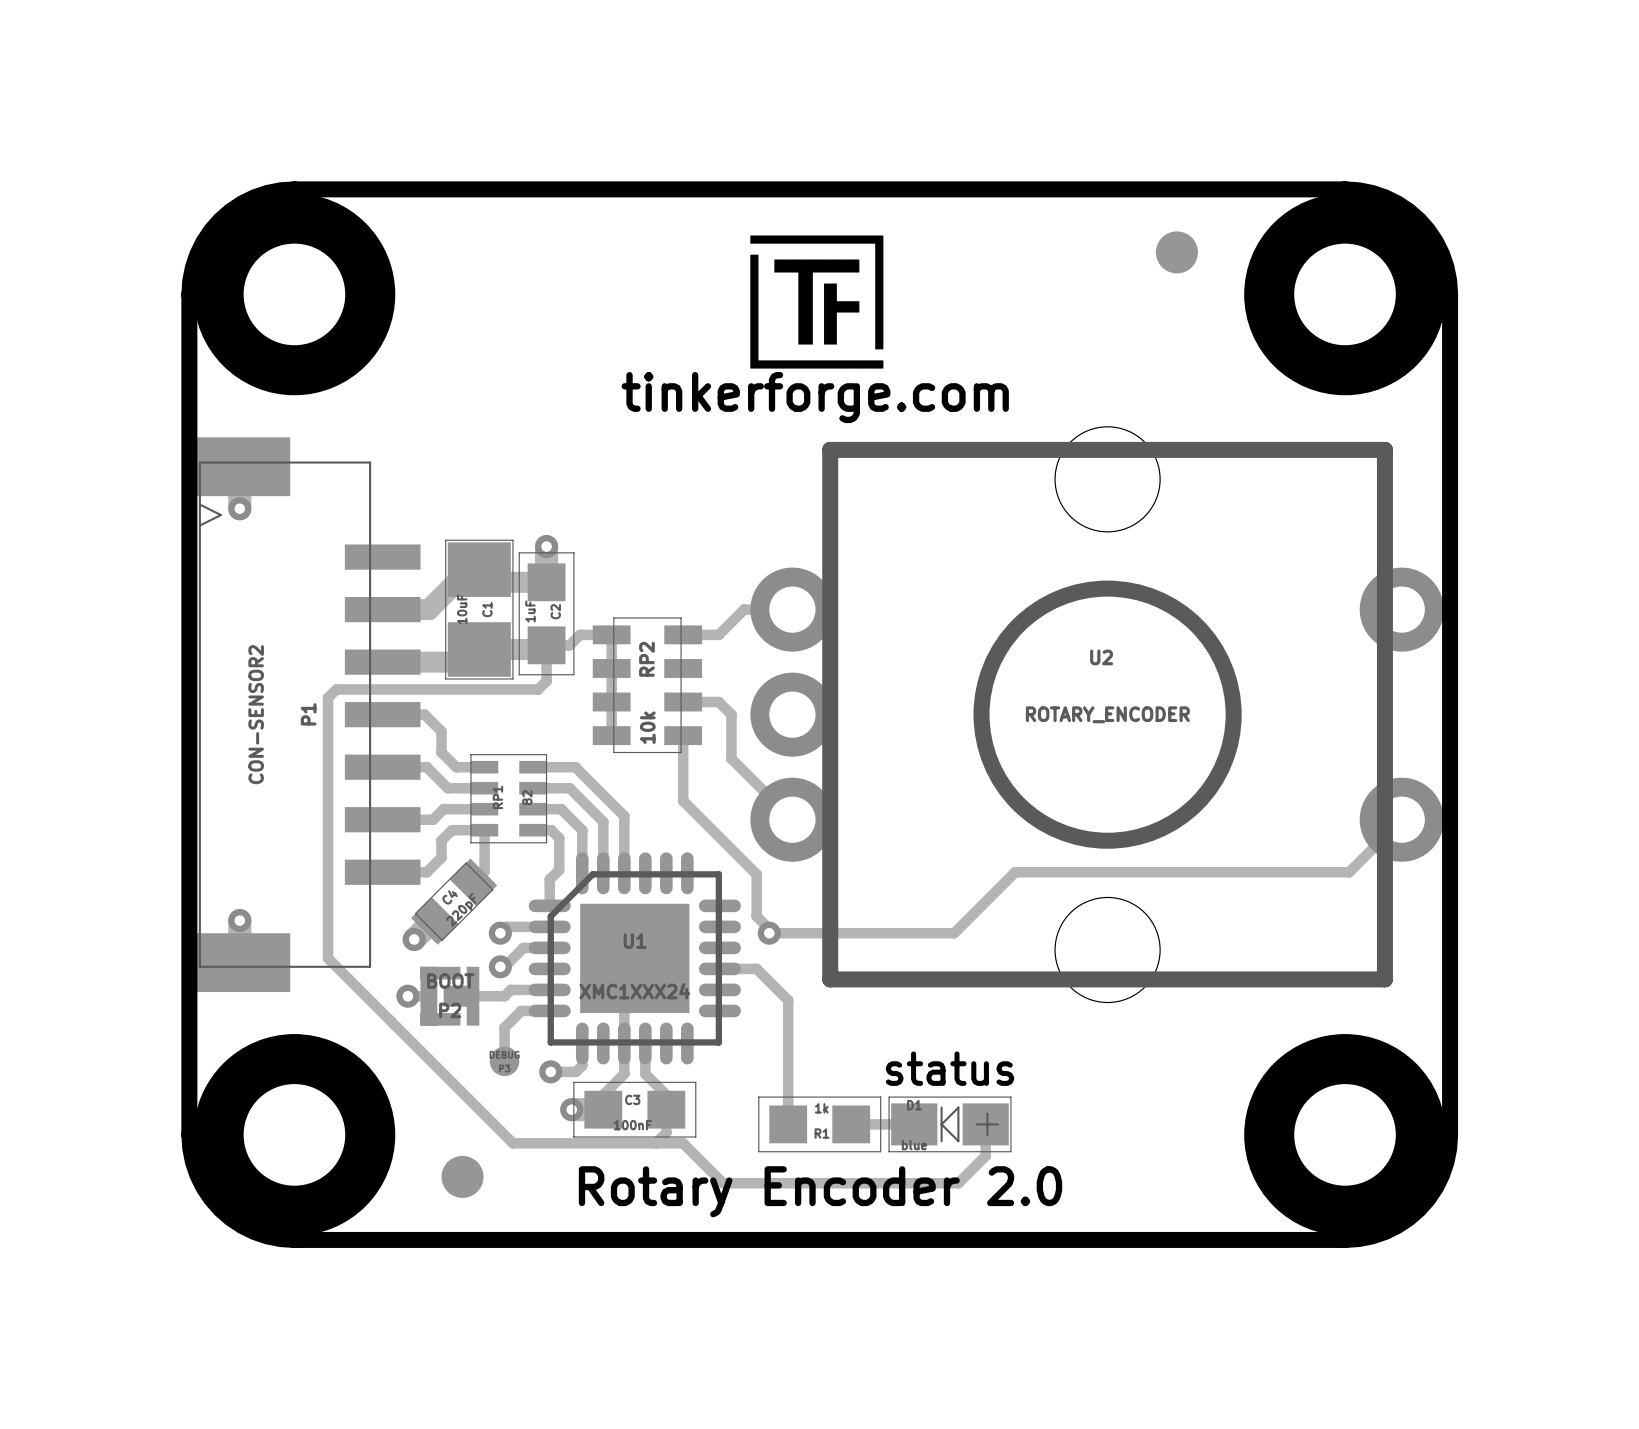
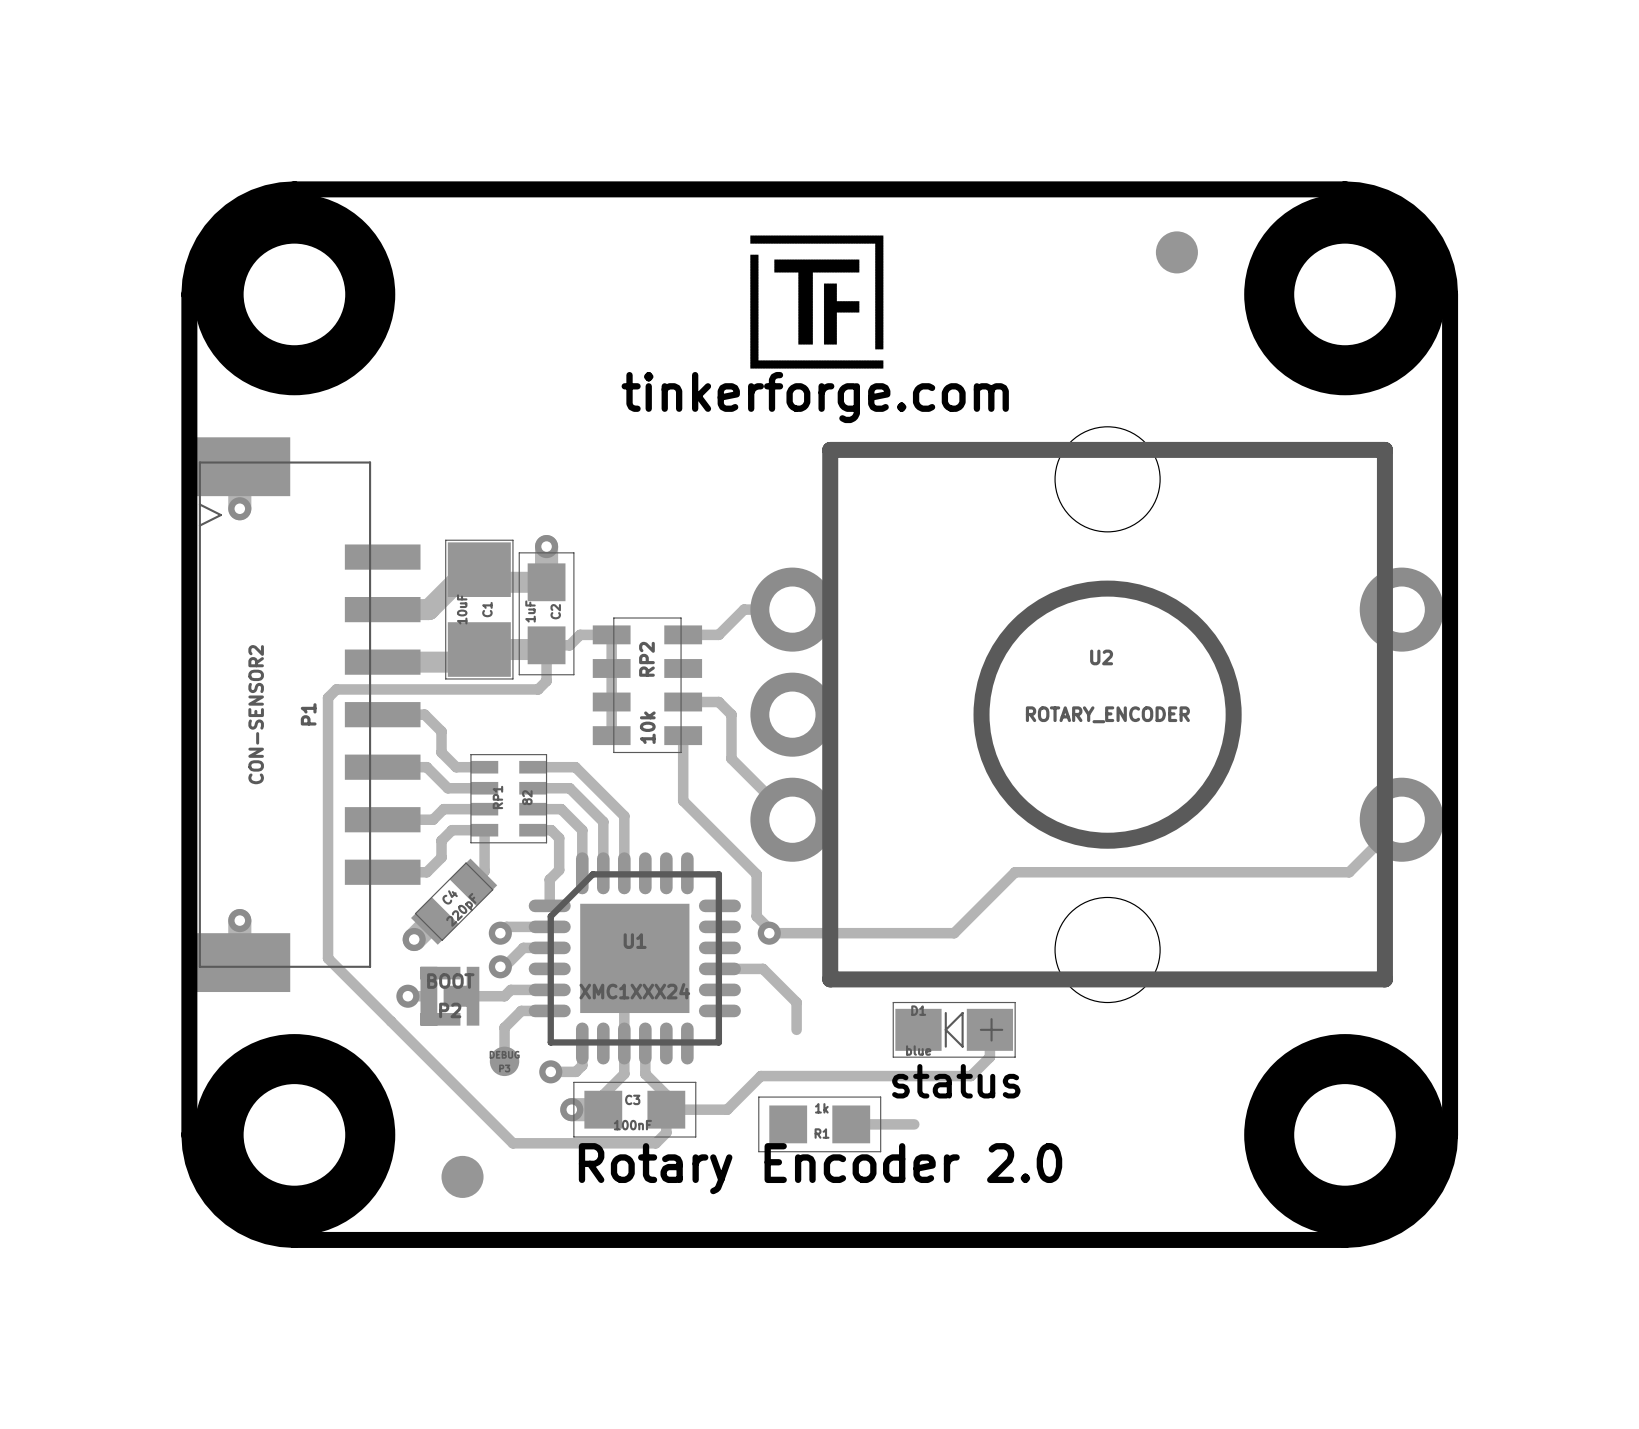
track: (756, 968) (788, 1000) (788, 1124) -> (756, 968) (762, 968) (796, 1002) (796, 1029)
track: none -> (989, 1029) (989, 1057) (971, 1076) (760, 1076) (727, 1109) (666, 1109)
text position: status (949, 1068) -> status (956, 1081)
part position: (949, 1124) -> (954, 1029)
track: (985, 1124) (985, 1155) (958, 1183) (723, 1183) (683, 1143) (655, 1143) -> none
text position: Rotary Encoder 2.0 (820, 1191) -> Rotary Encoder 2.0 (820, 1168)

